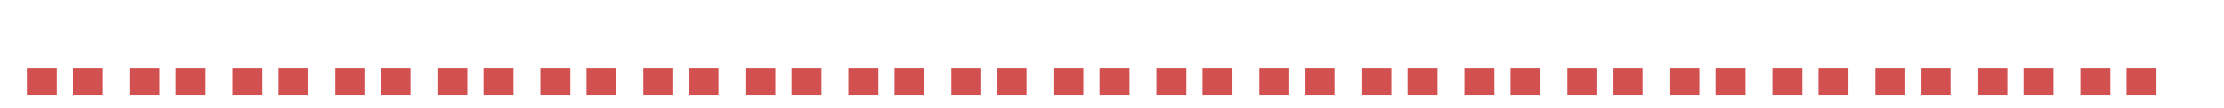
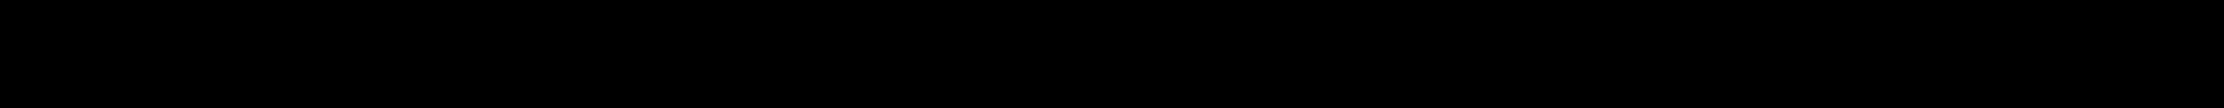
part: (64, 81) -> none
part: (167, 81) -> none
part: (270, 81) -> none
part: (372, 81) -> none
part: (475, 81) -> none
part: (578, 81) -> none
part: (680, 81) -> none
part: (783, 81) -> none
part: (886, 81) -> none
part: (988, 81) -> none
part: (1091, 81) -> none
part: (1194, 81) -> none
part: (1296, 81) -> none
part: (1399, 81) -> none
part: (1502, 81) -> none
part: (1604, 81) -> none
part: (1707, 81) -> none
part: (1810, 81) -> none
part: (1913, 81) -> none
part: (2015, 81) -> none
part: (2118, 81) -> none

